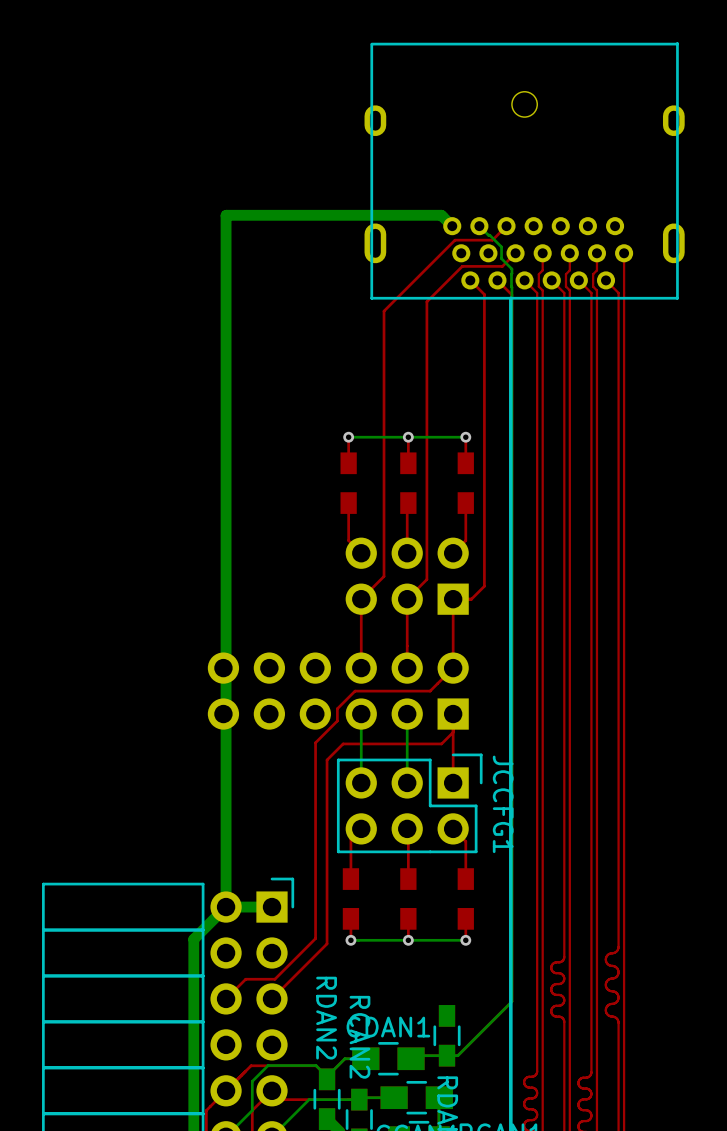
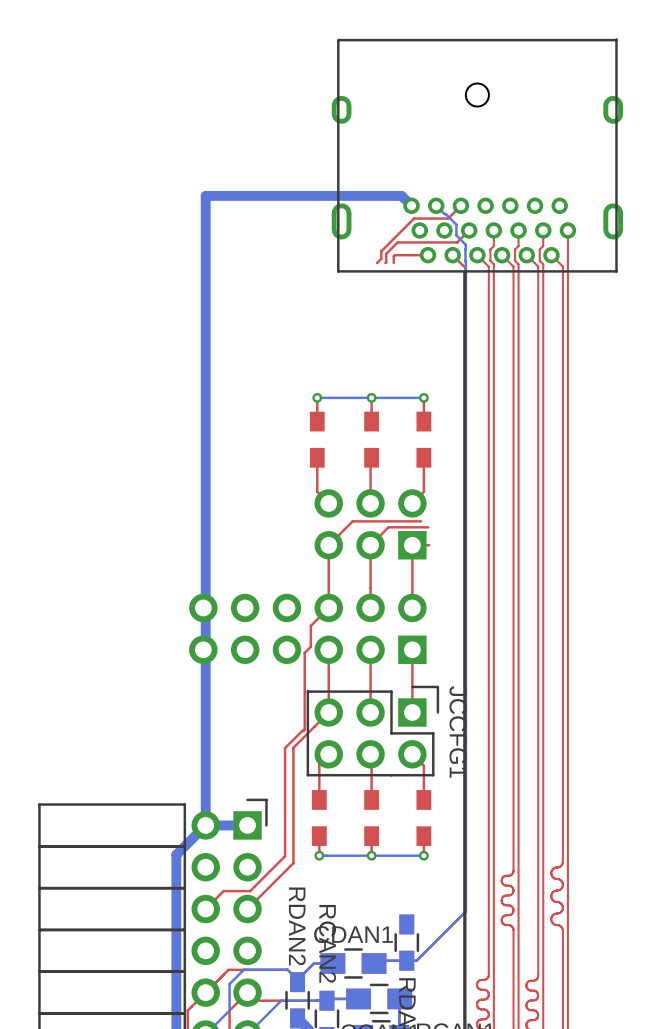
top track: (462, 266) (426, 301) (426, 579) -> (420, 242) (397, 242) (386, 253) (385, 263)
top track: (418, 276) (384, 311) (384, 576) -> (381, 251) (381, 258) (377, 263)
top track: (470, 280) (484, 294) (484, 586) (471, 599) -> (428, 255) (394, 255) (393, 263)
top track: none -> (420, 521) (352, 521) (349, 524)
top track: none -> (428, 527) (388, 527)
top track: (453, 668) (430, 691) (355, 691) (337, 708) (337, 720) (315, 742) (315, 938) (313, 940) -> (328, 607) (310, 625) (310, 646) (304, 652) (304, 729) (285, 748) (285, 856)
bottom track: (361, 714) (361, 782) -> none
bottom track: (407, 714) (407, 782) -> none
top track: none -> (370, 649) (370, 712)
top track: (453, 732) (441, 743) (343, 743) (327, 760) (327, 943) (322, 948) -> (328, 649) (328, 712) (293, 747) (293, 863)

